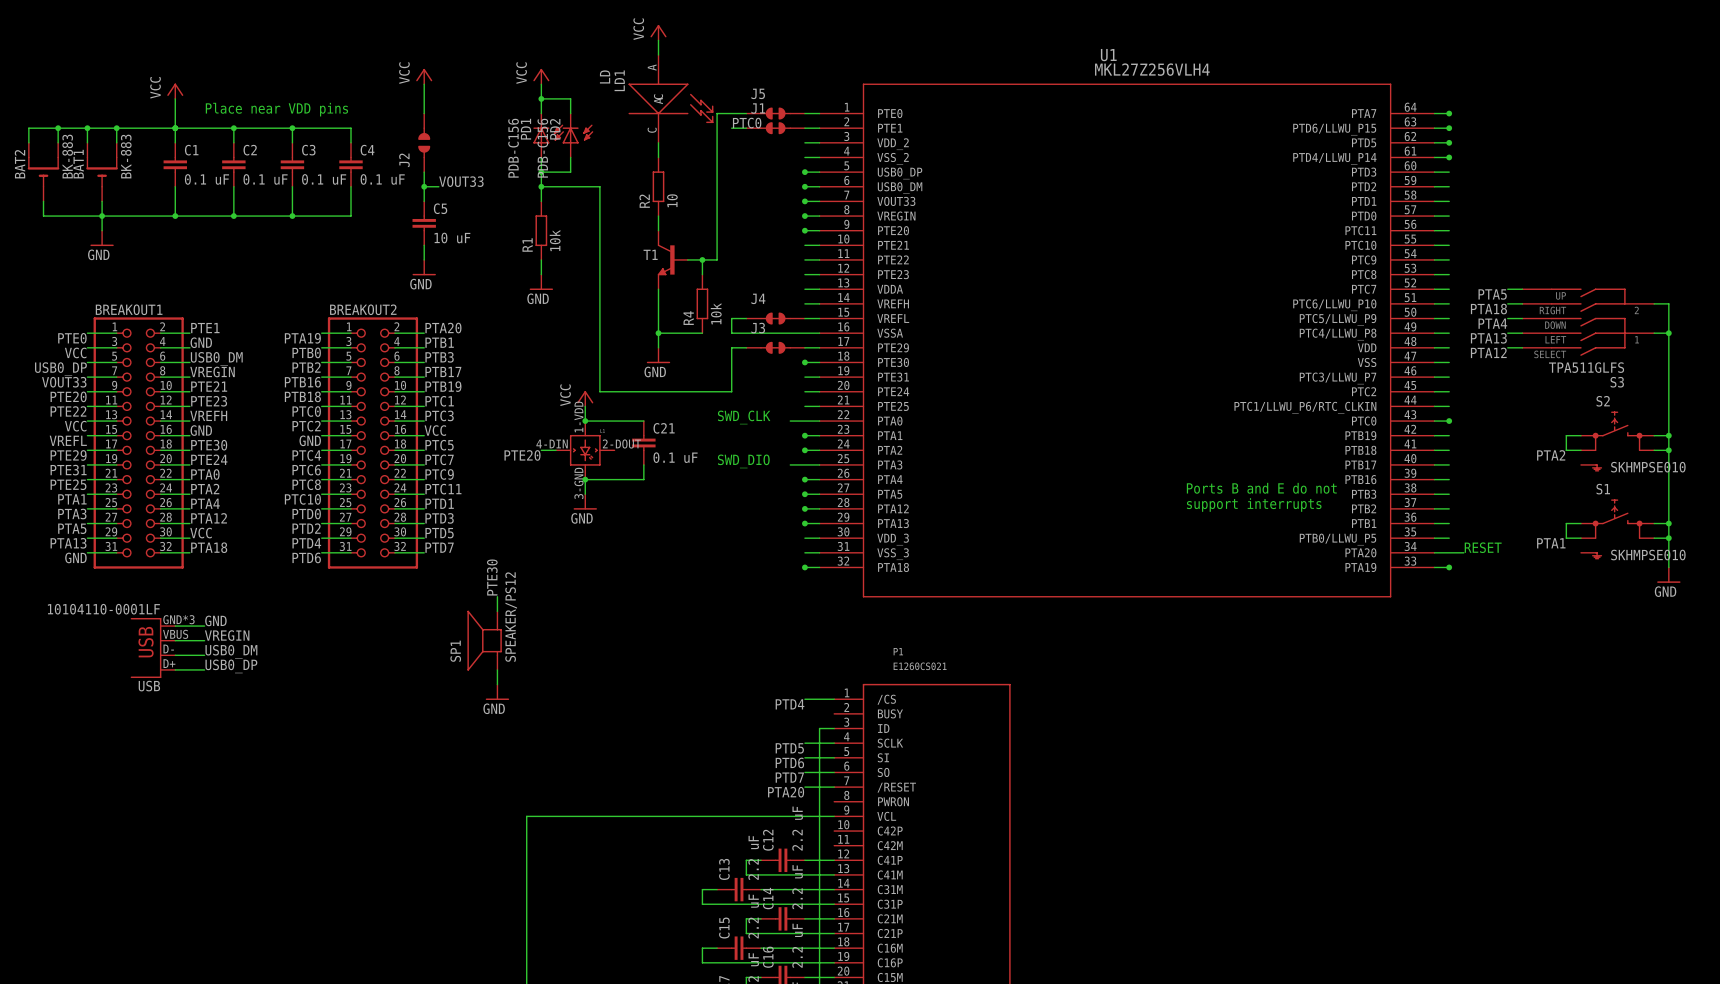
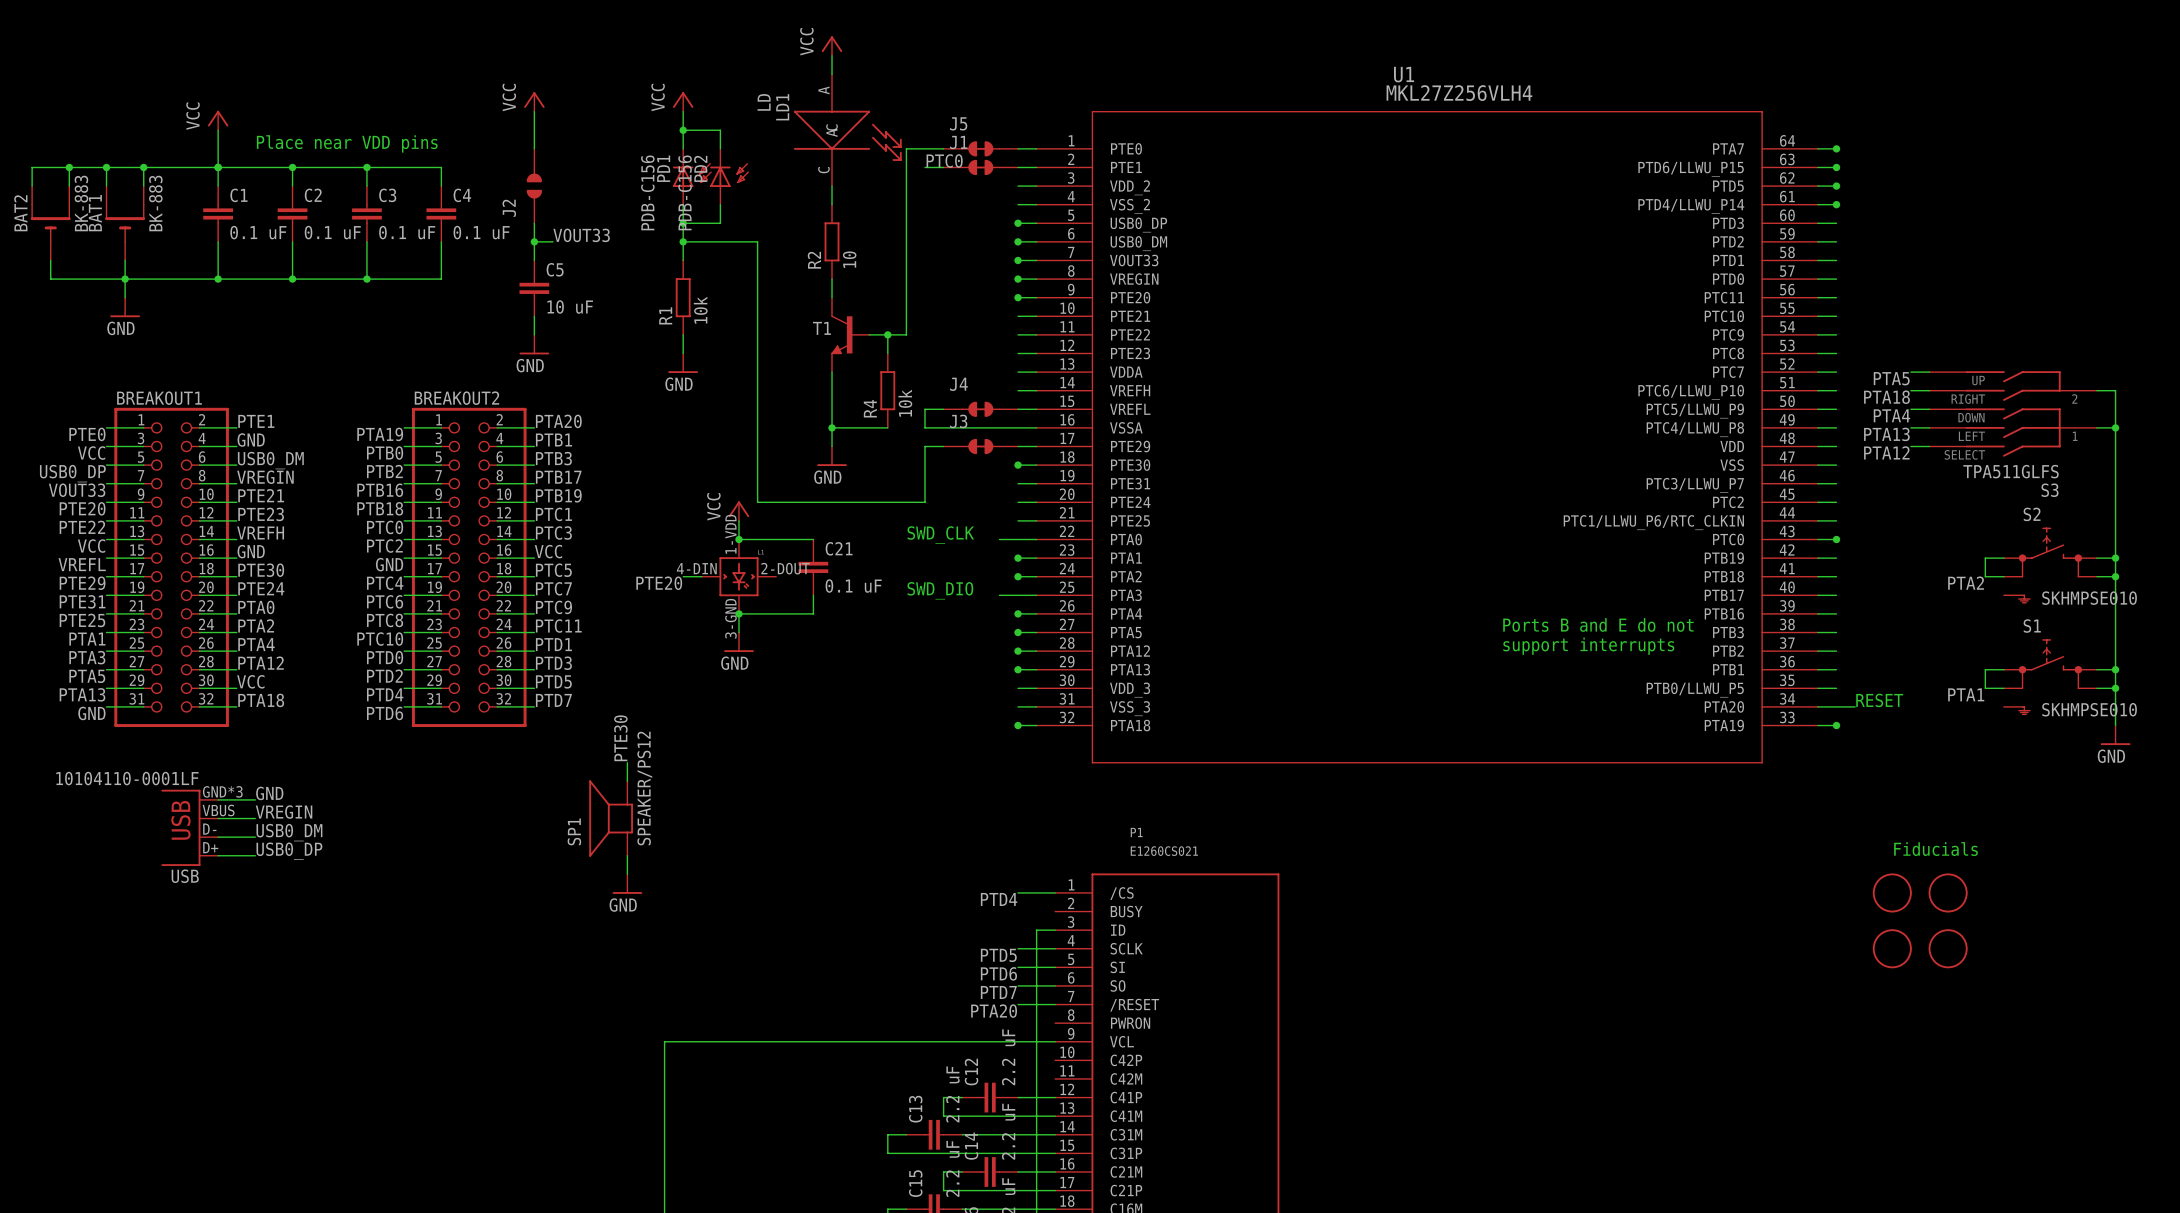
text: none -> Fiducials (1935, 849)
part: none -> (1892, 892)
part: none -> (1948, 892)
part: none -> (1892, 948)
part: none -> (1948, 948)

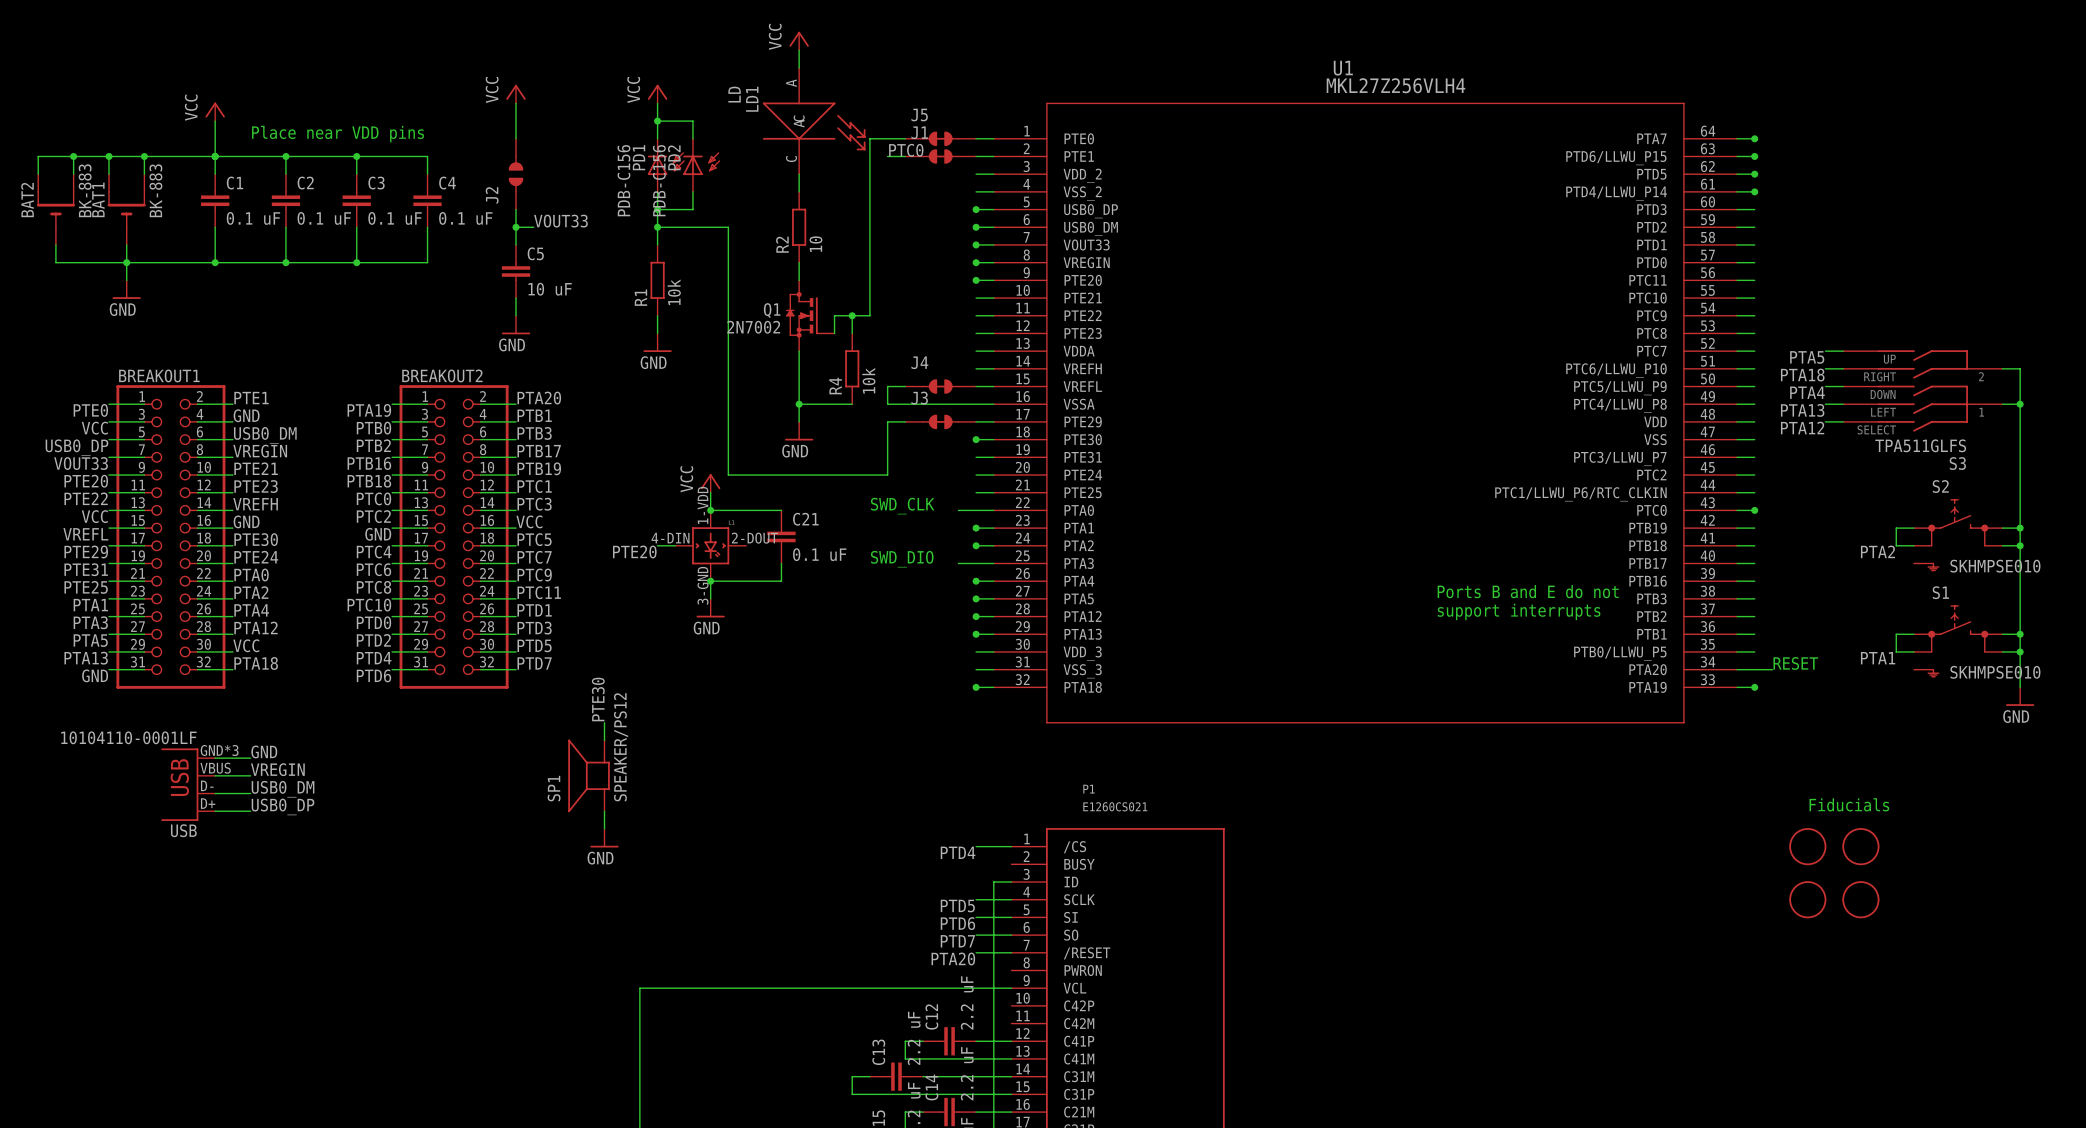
Q1: none -> 2N7002 (810, 315)
T1: (850, 334) -> none
wire: none -> (834, 315) (834, 333)

